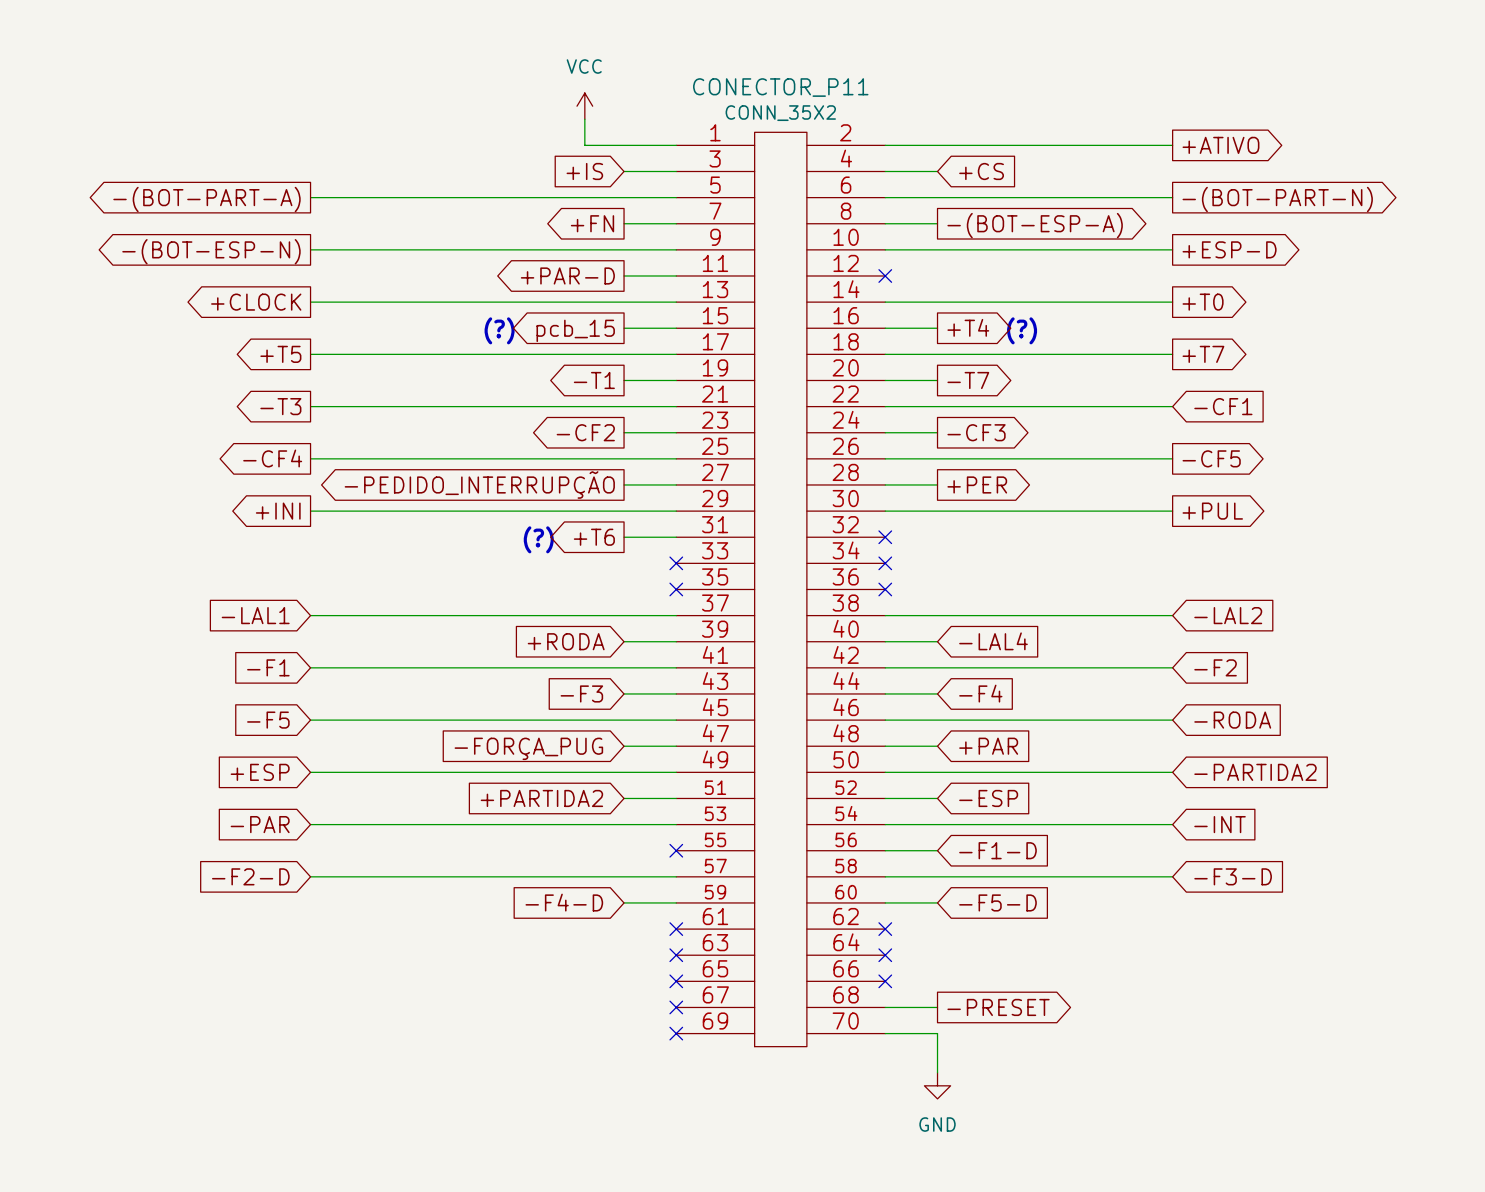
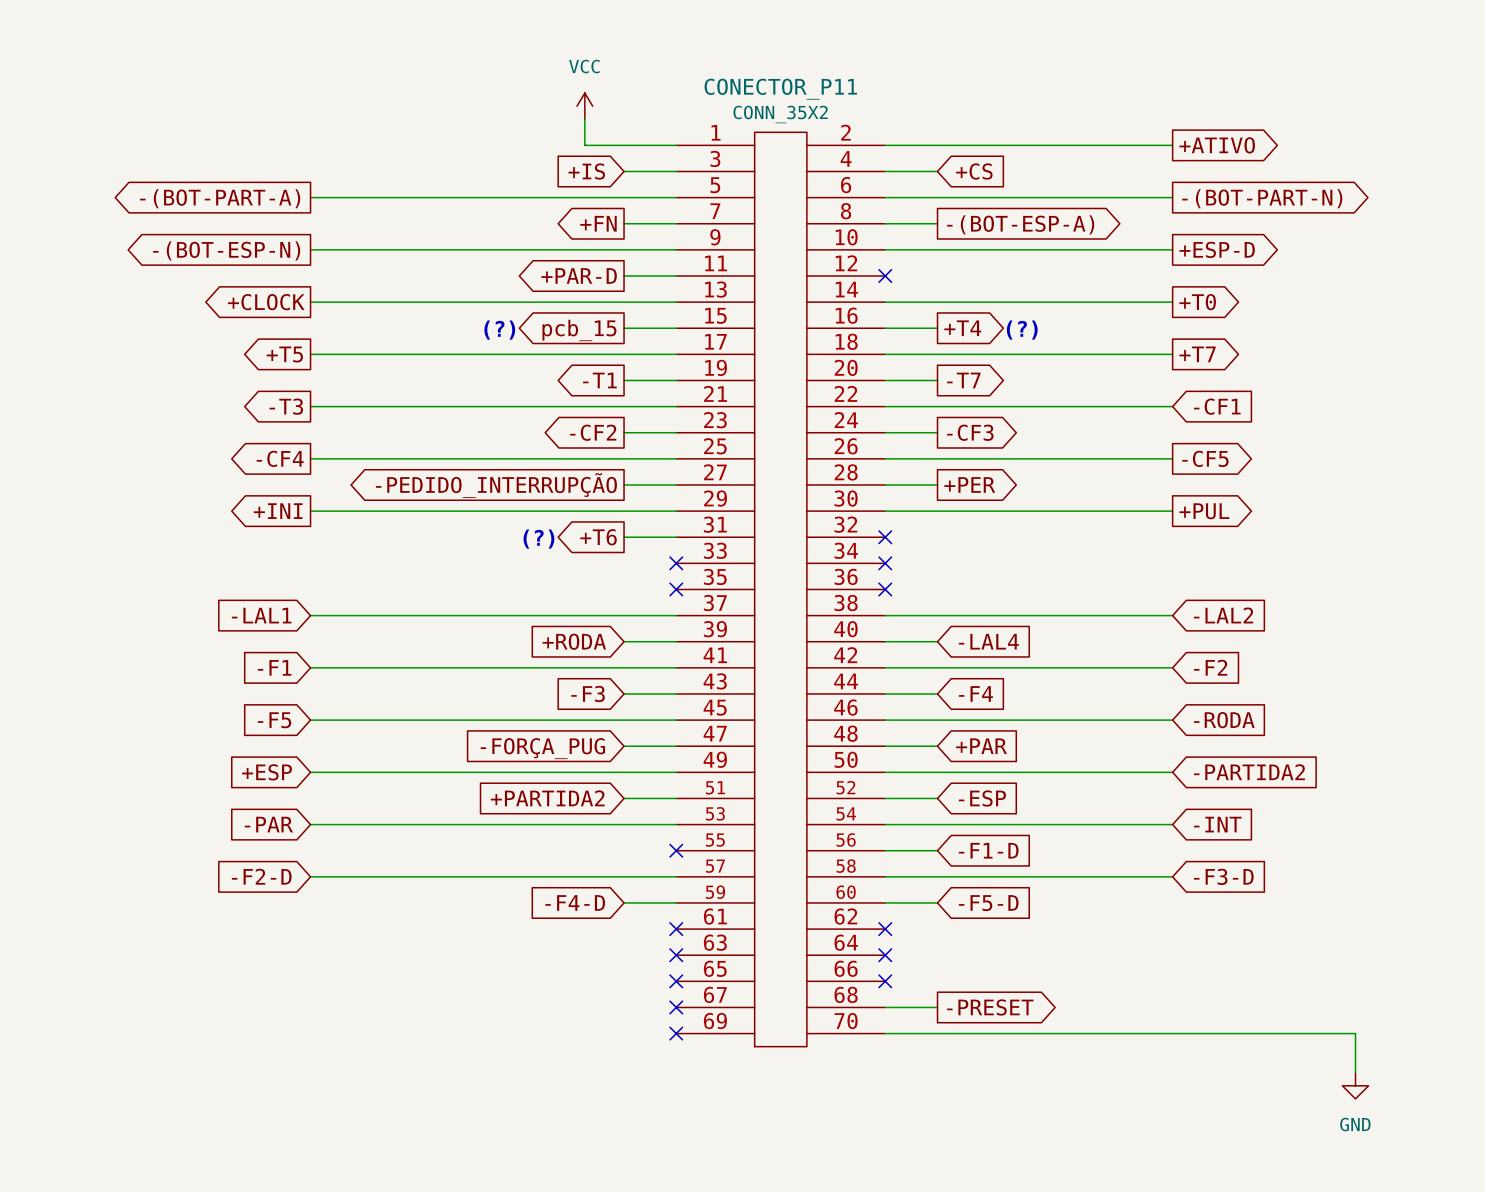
wire: (937, 1033) (937, 1072) -> (937, 1033) (1355, 1033) (1355, 1072)
power symbol: GND (937, 1085) -> none
power symbol: none -> GND (1355, 1085)

